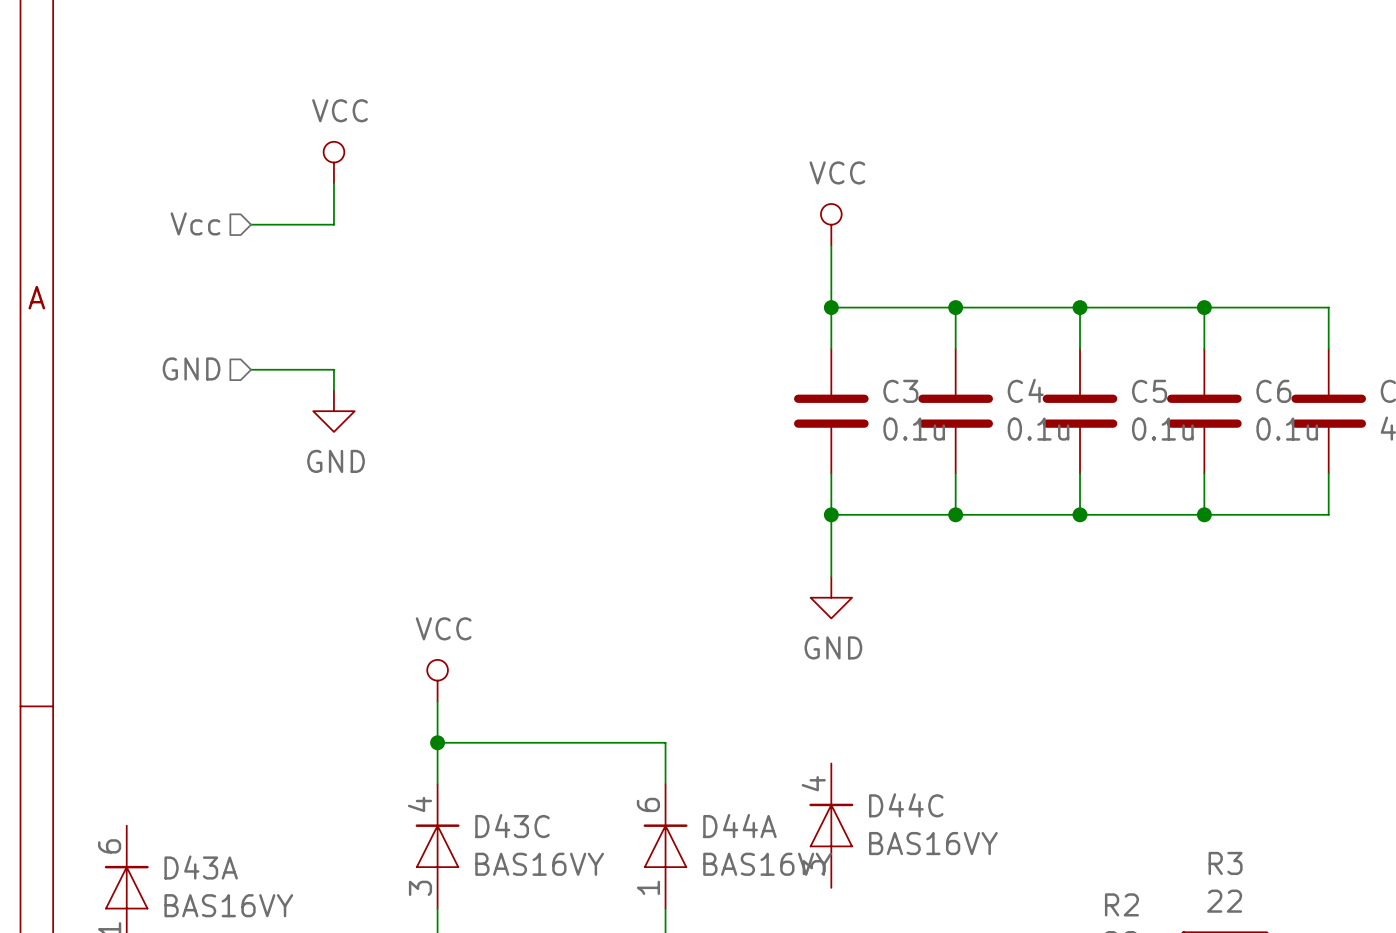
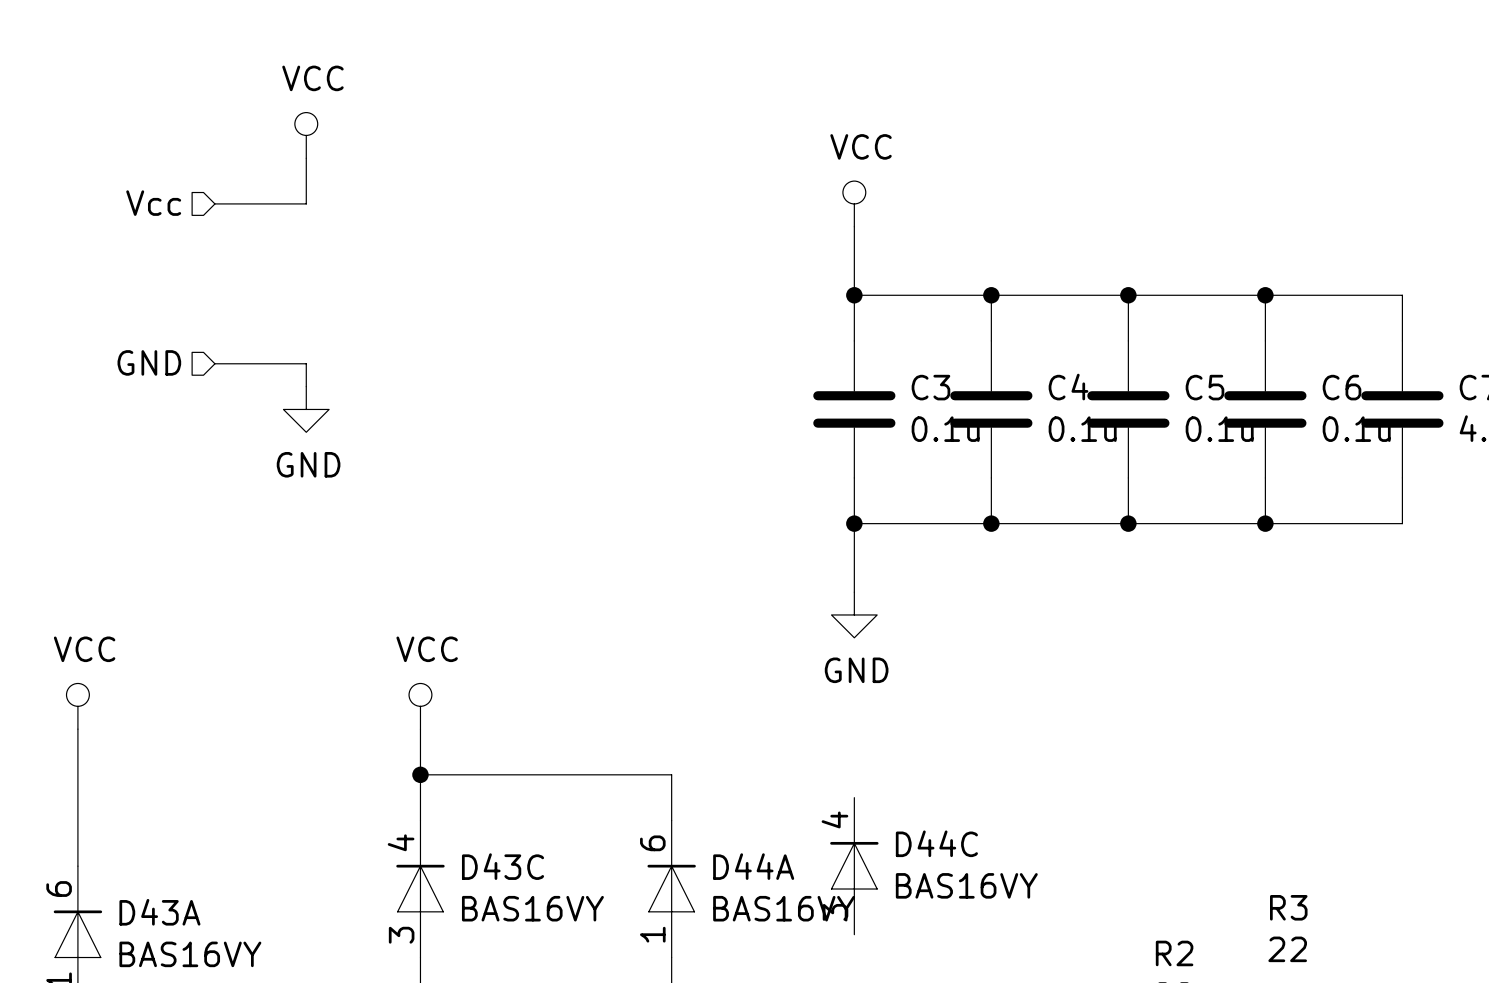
power symbol: none -> VCC (77, 706)
wire: none -> (77, 729) (77, 866)

